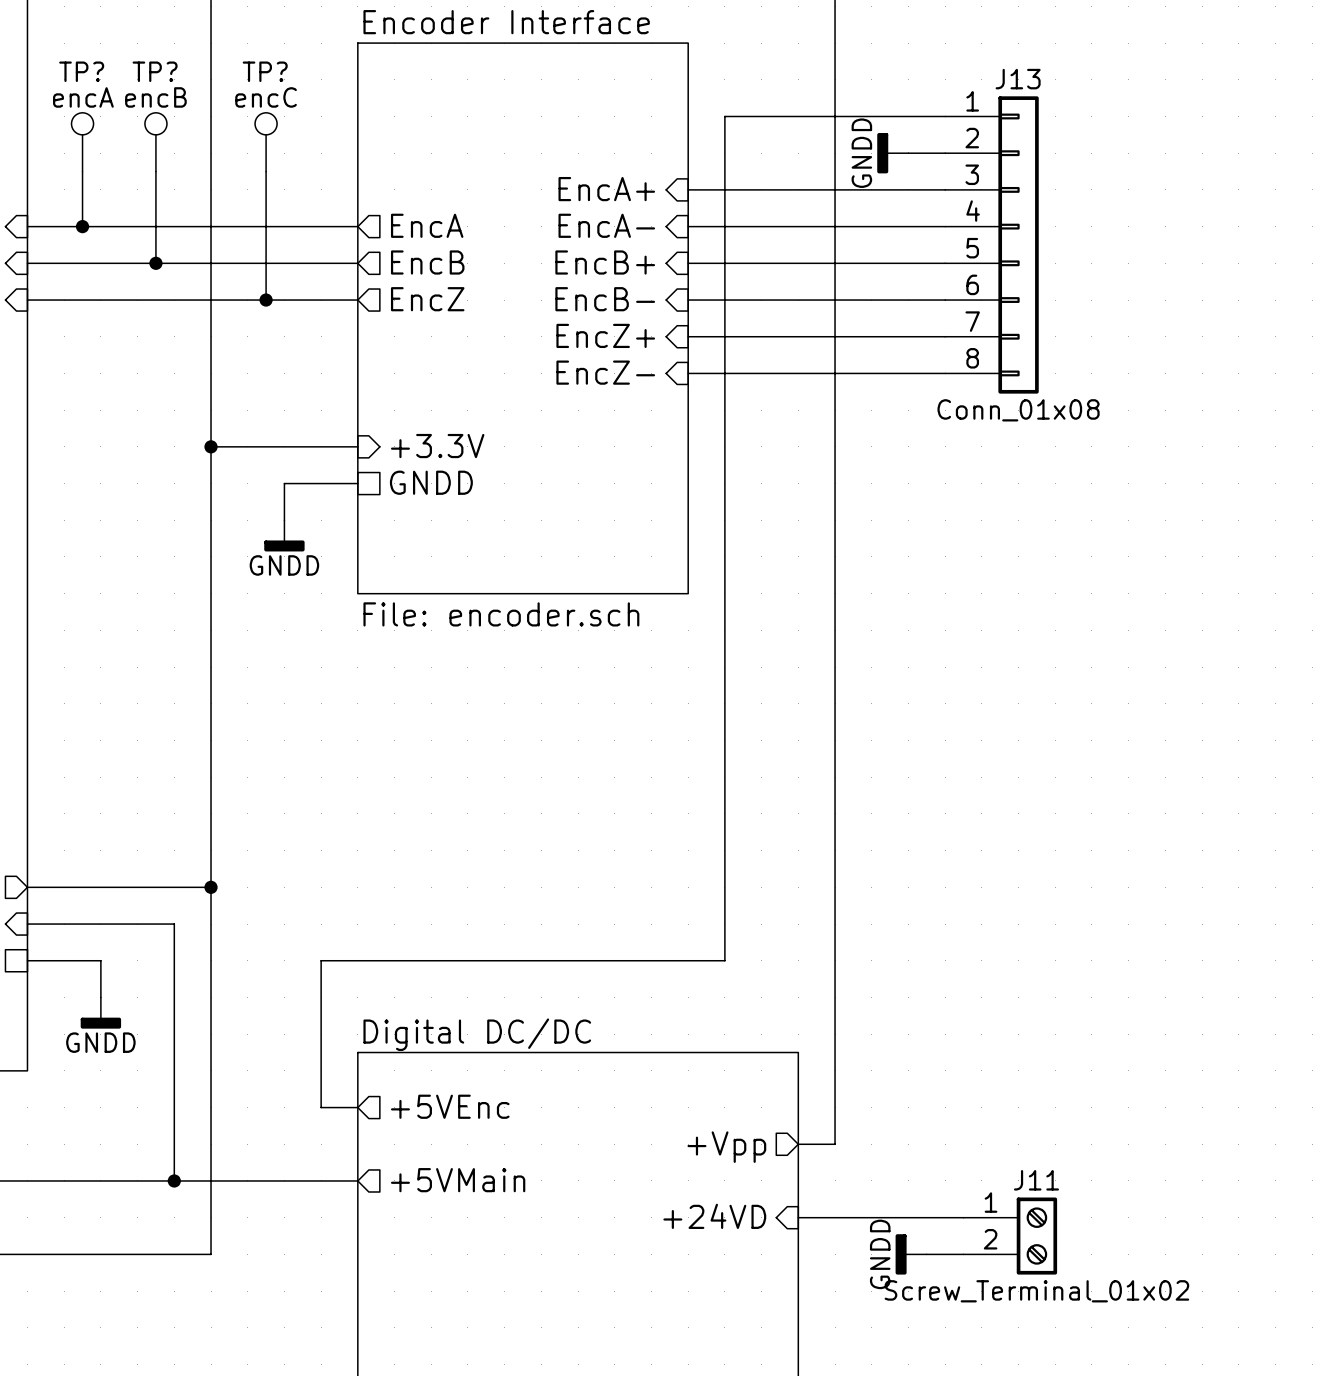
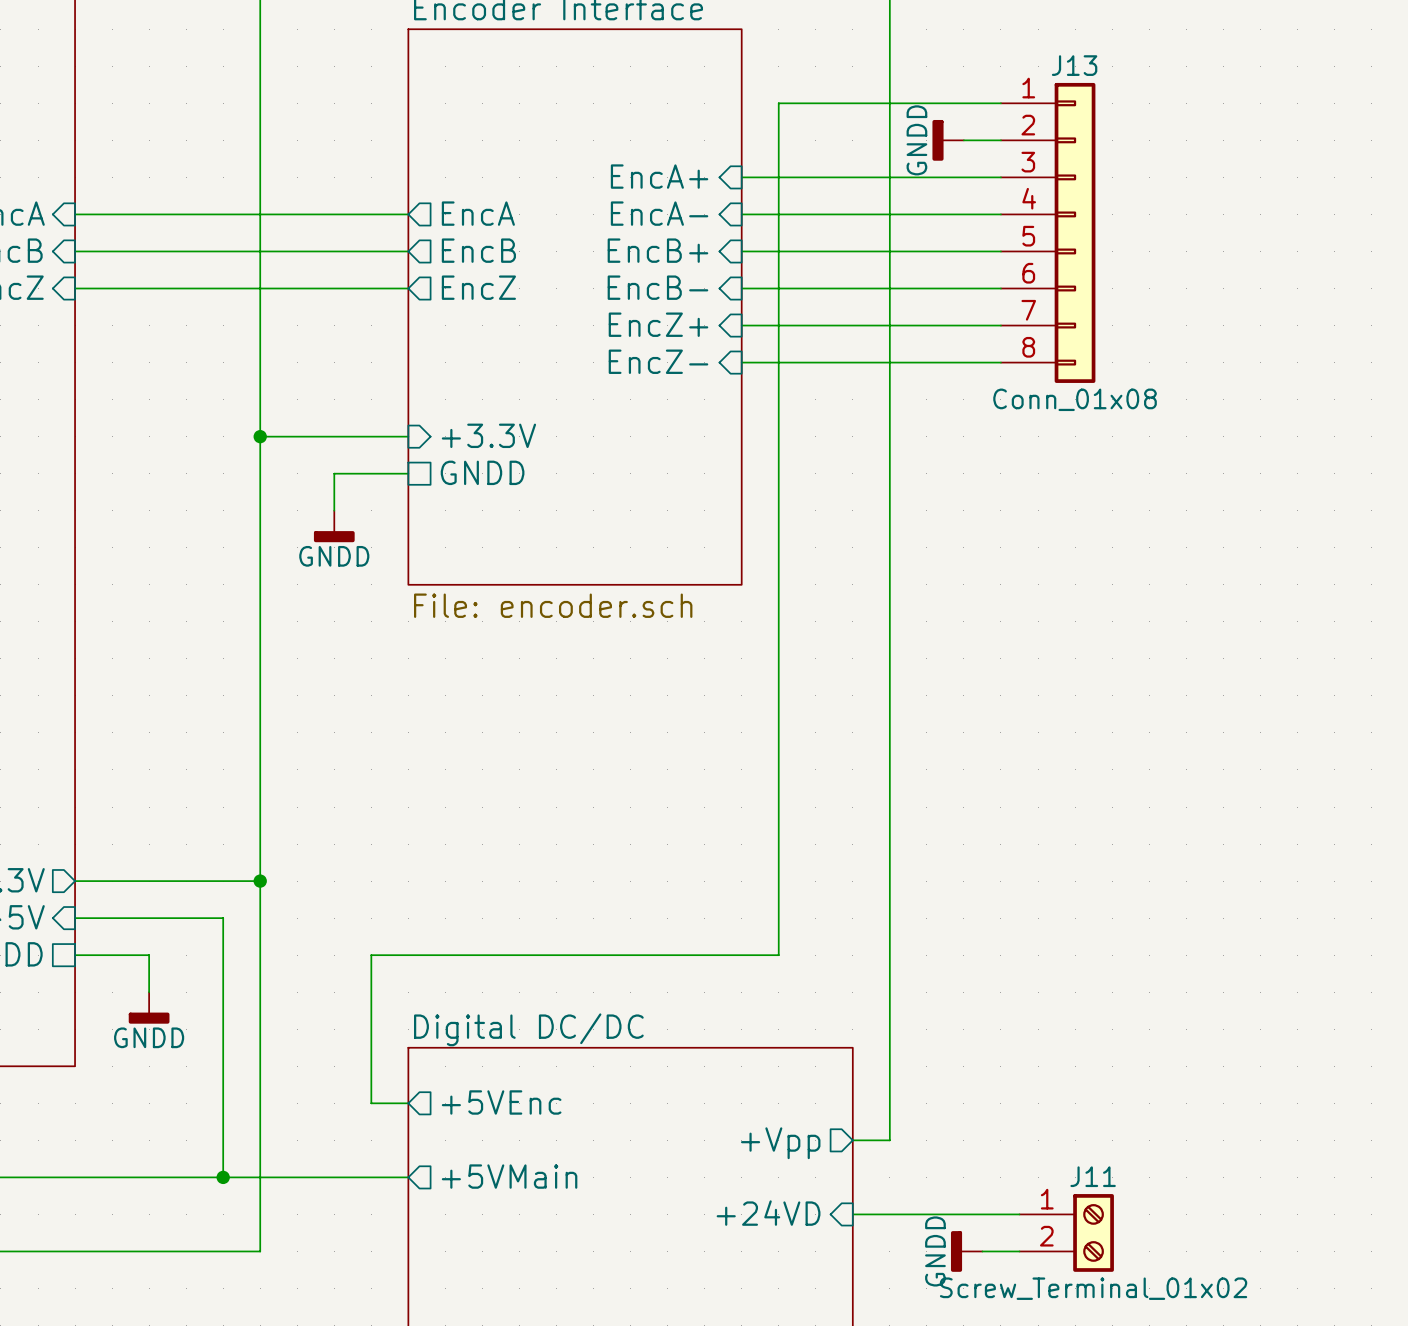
TP?: encA (82, 142) -> none
TP?: encB (155, 142) -> none
TP?: encC (266, 142) -> none
wire: (82, 171) (82, 226) -> none
wire: (155, 171) (155, 263) -> none
wire: (266, 171) (266, 300) -> none
junction: (82, 226) -> none
junction: (155, 263) -> none
junction: (266, 300) -> none

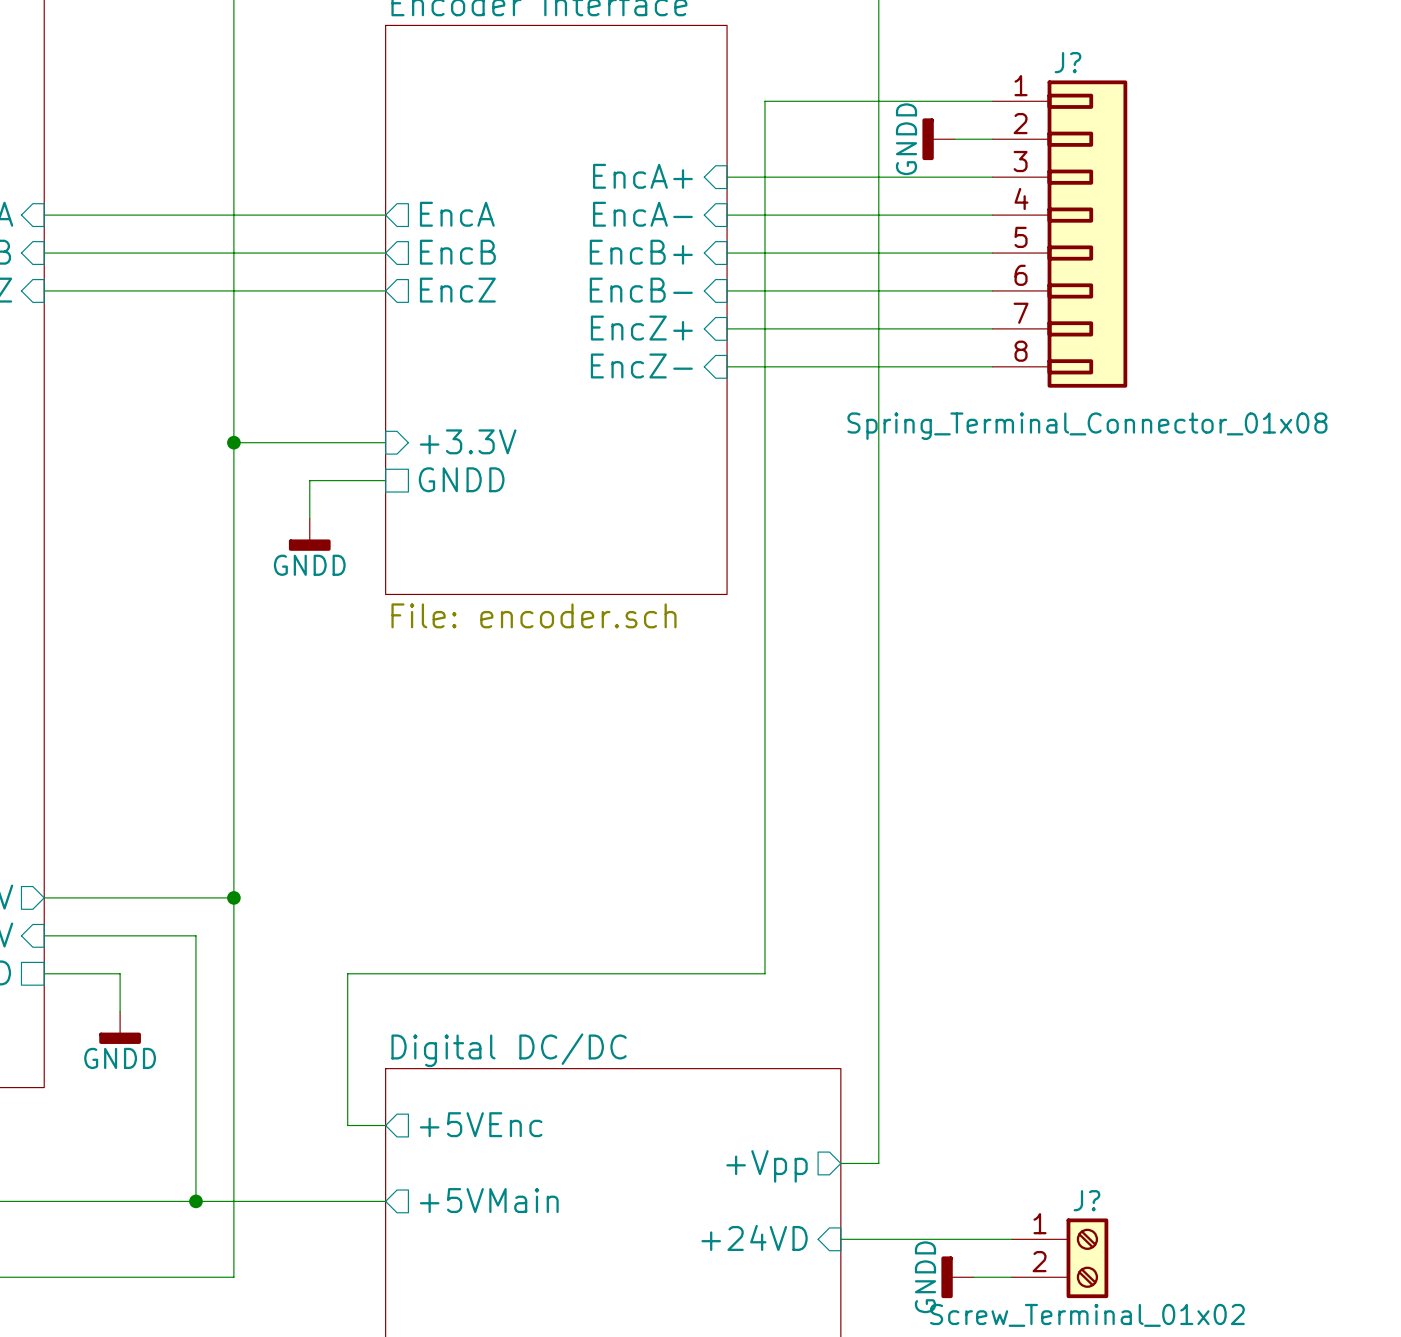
J13: Conn_01x08 (1048, 232) -> none
J?: none -> Spring_Terminal_Connector_01x08 (1059, 234)
J11 name: J11 (1093, 1176) -> J? (1086, 1200)

